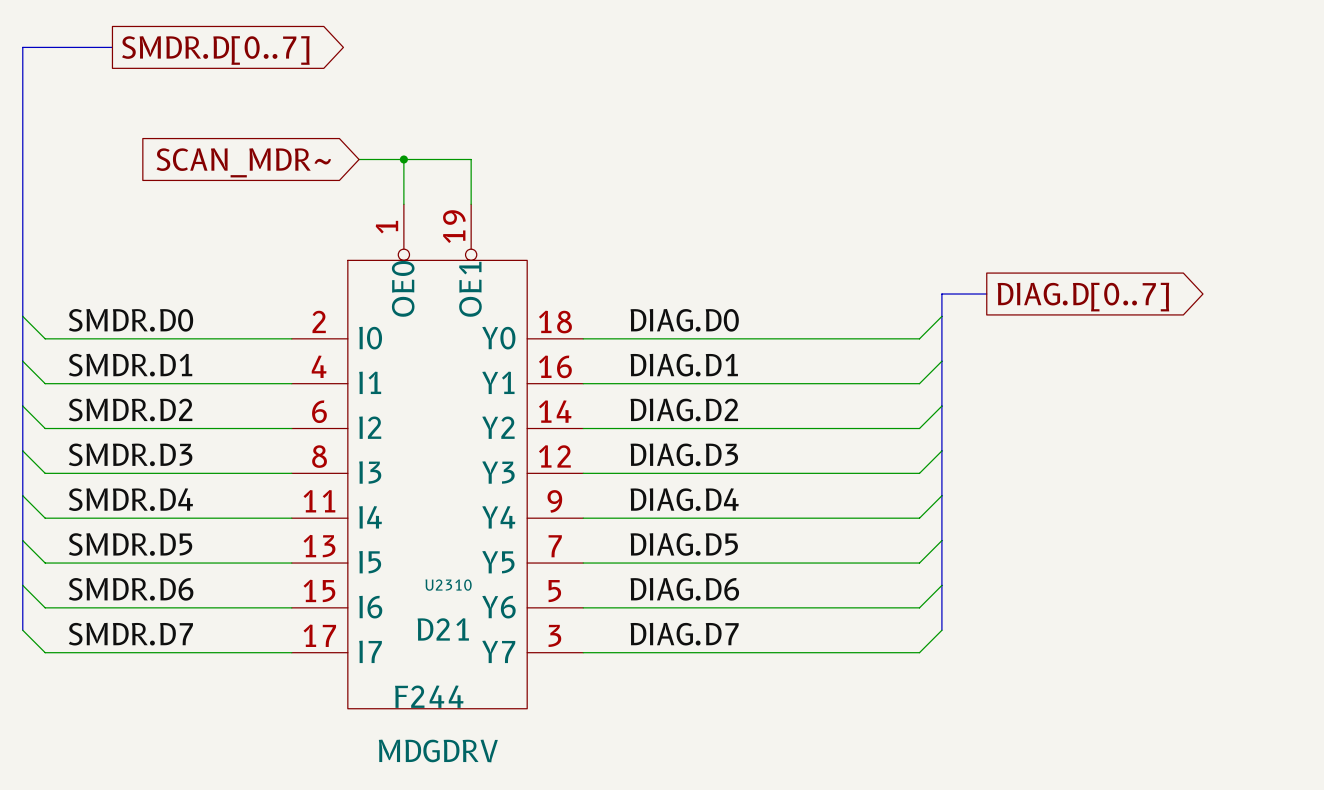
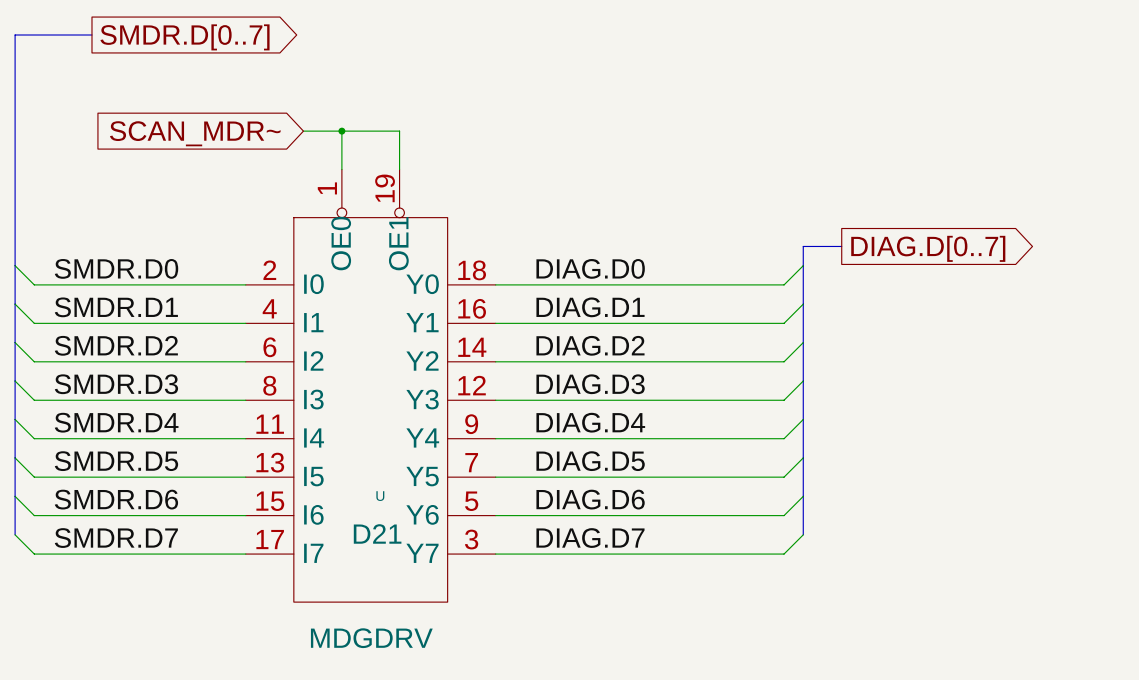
U2310 name: U2310 (448, 585) -> U (380, 496)
U2310 value: F244 (429, 696) -> none

